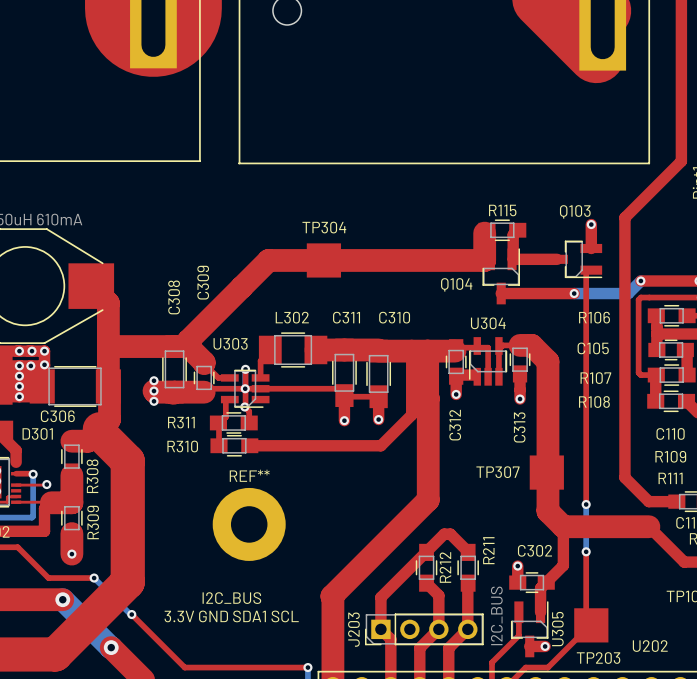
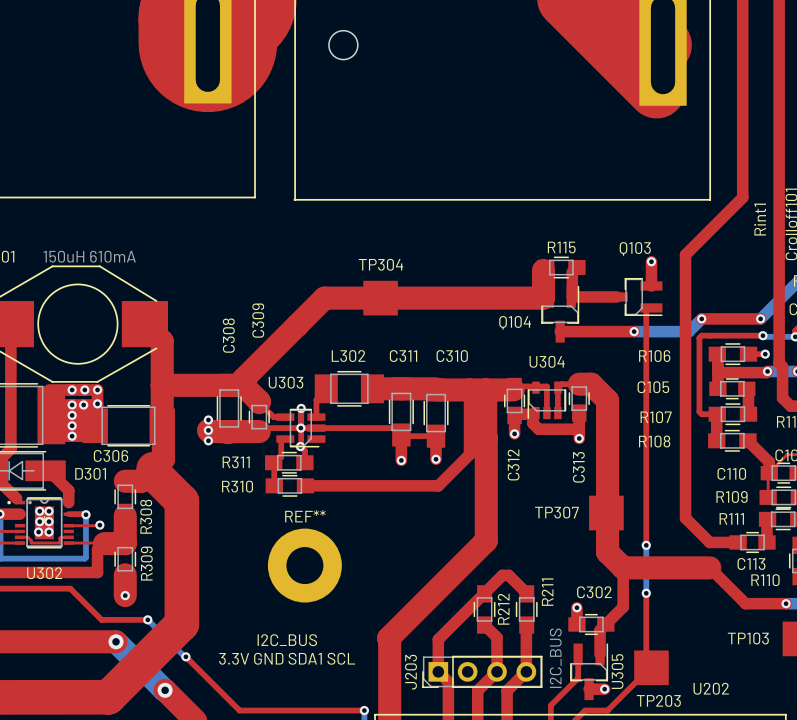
U304 footprint: [469, 337, 508, 386] -> [527, 381, 567, 420]
top track: none -> (533, 414) (533, 423) (538, 429) (579, 429)

